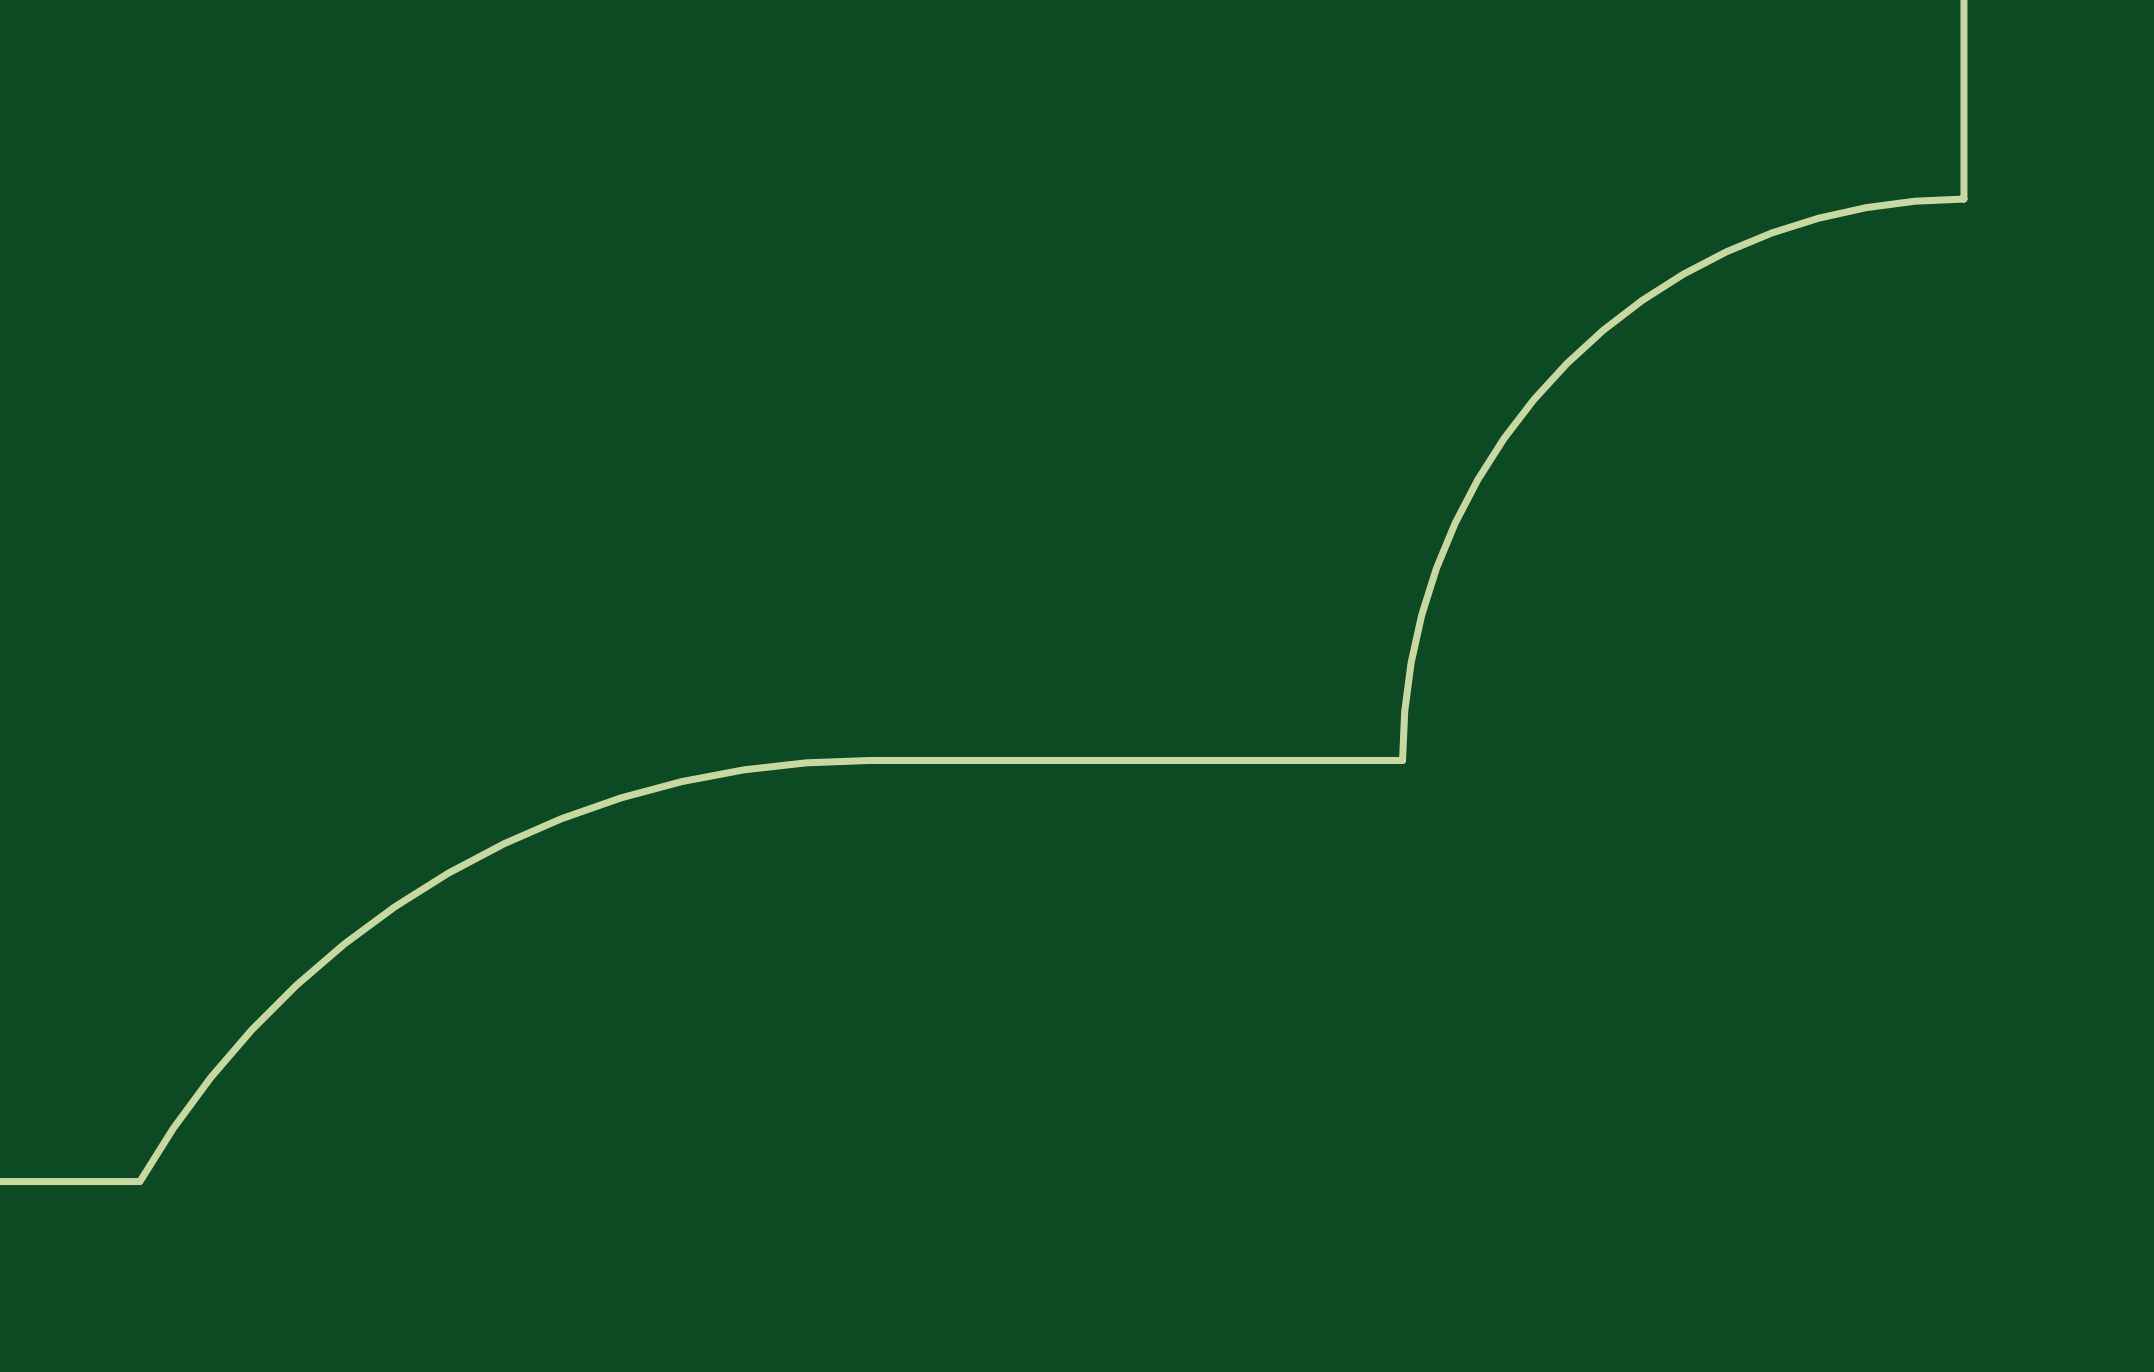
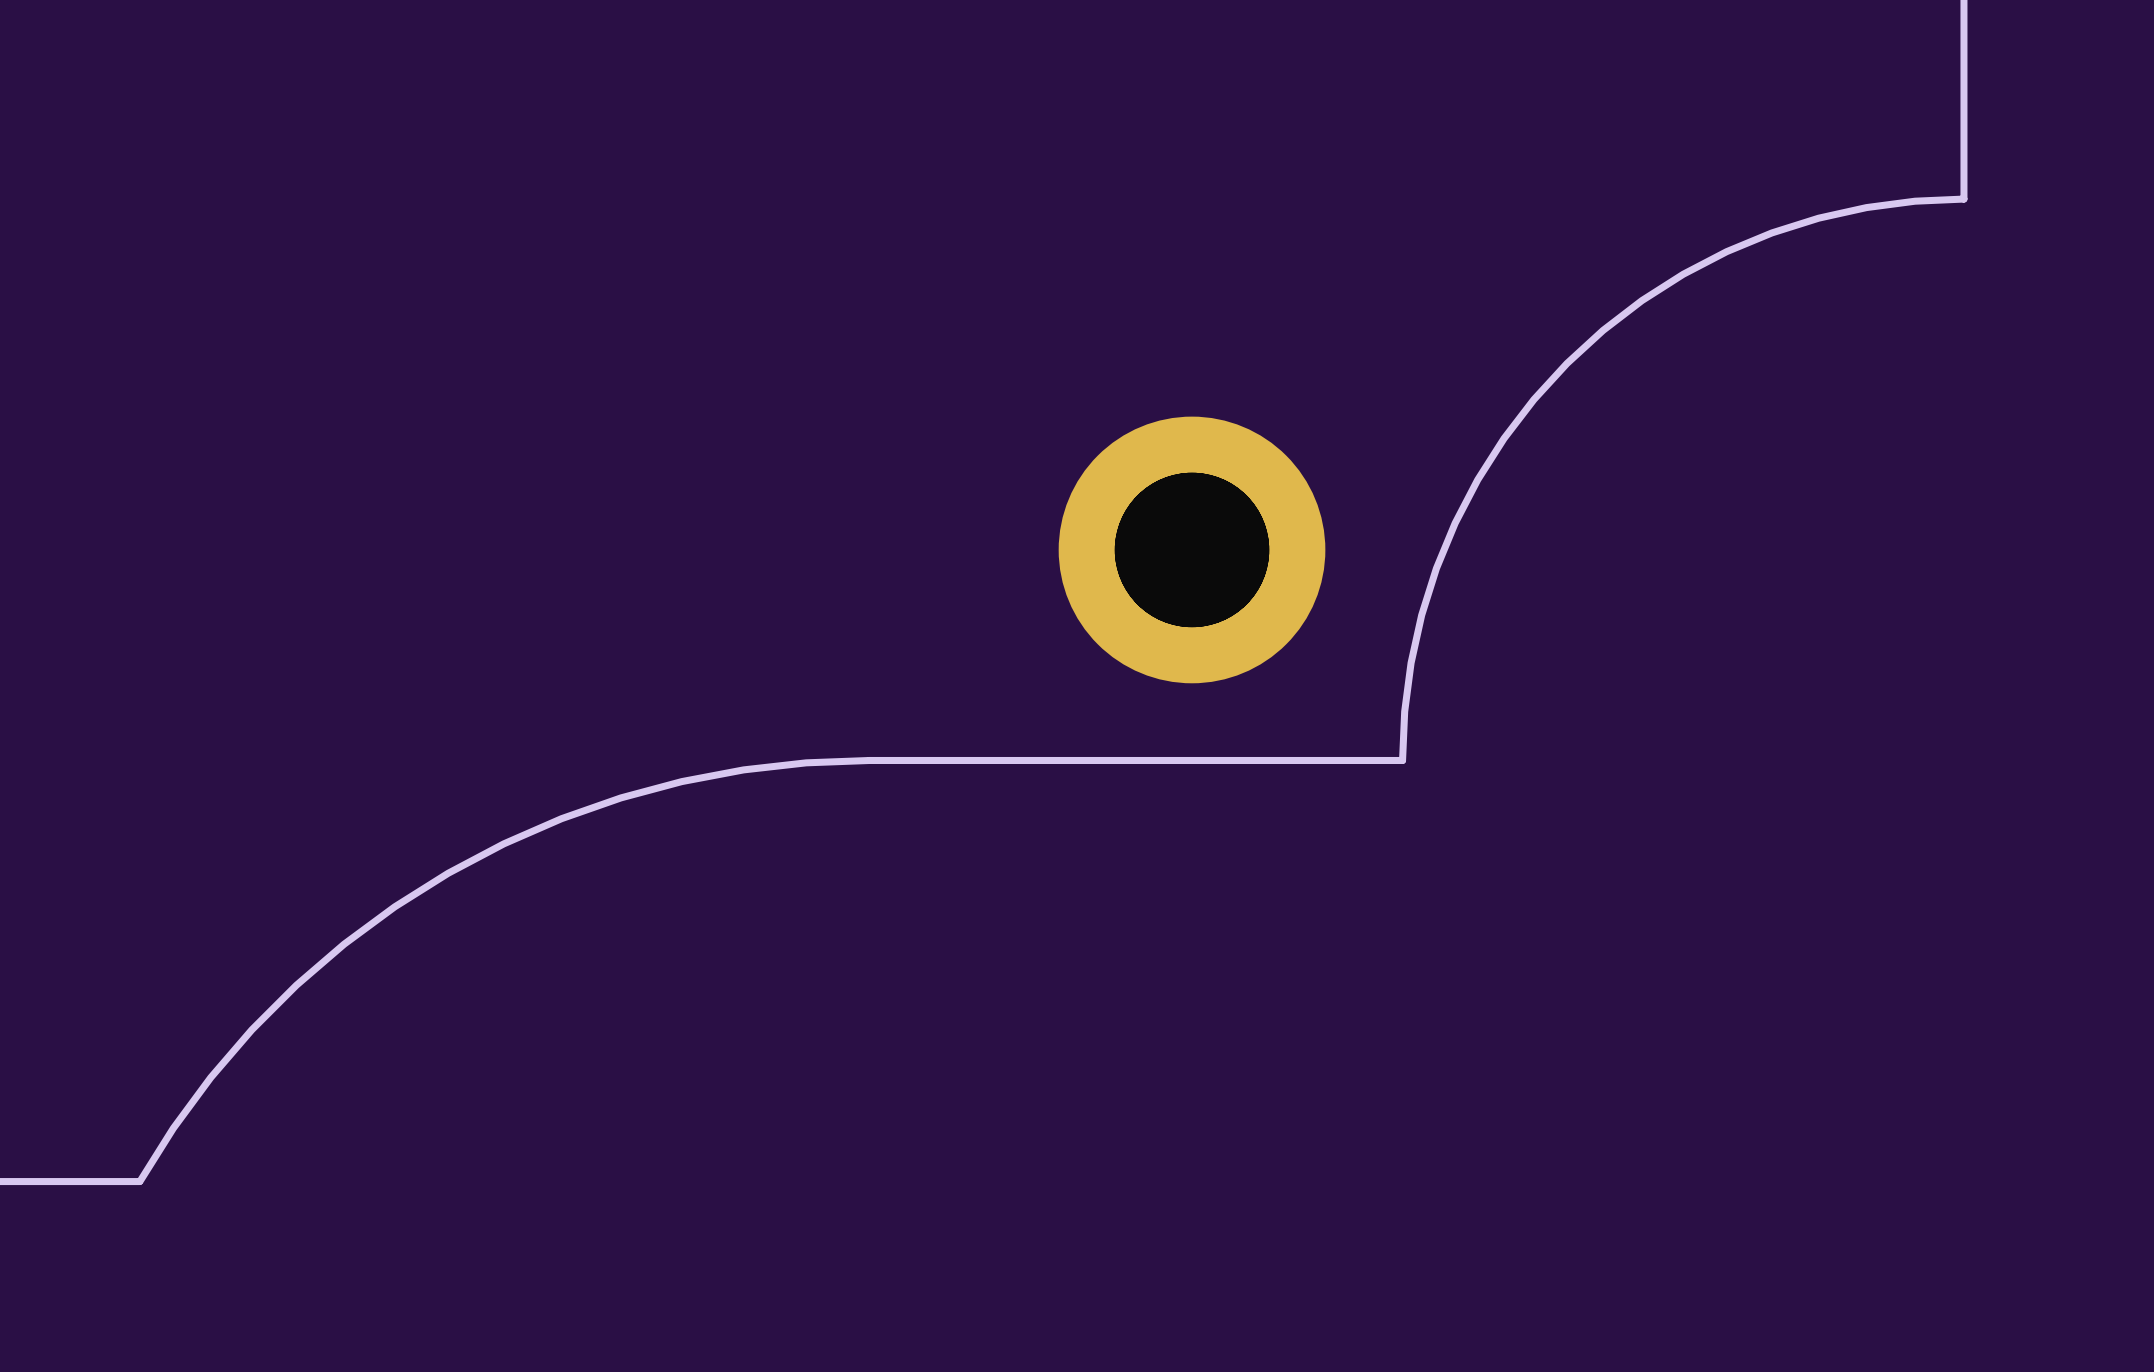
part: none -> (1192, 549)
part: none -> (1192, 549)

